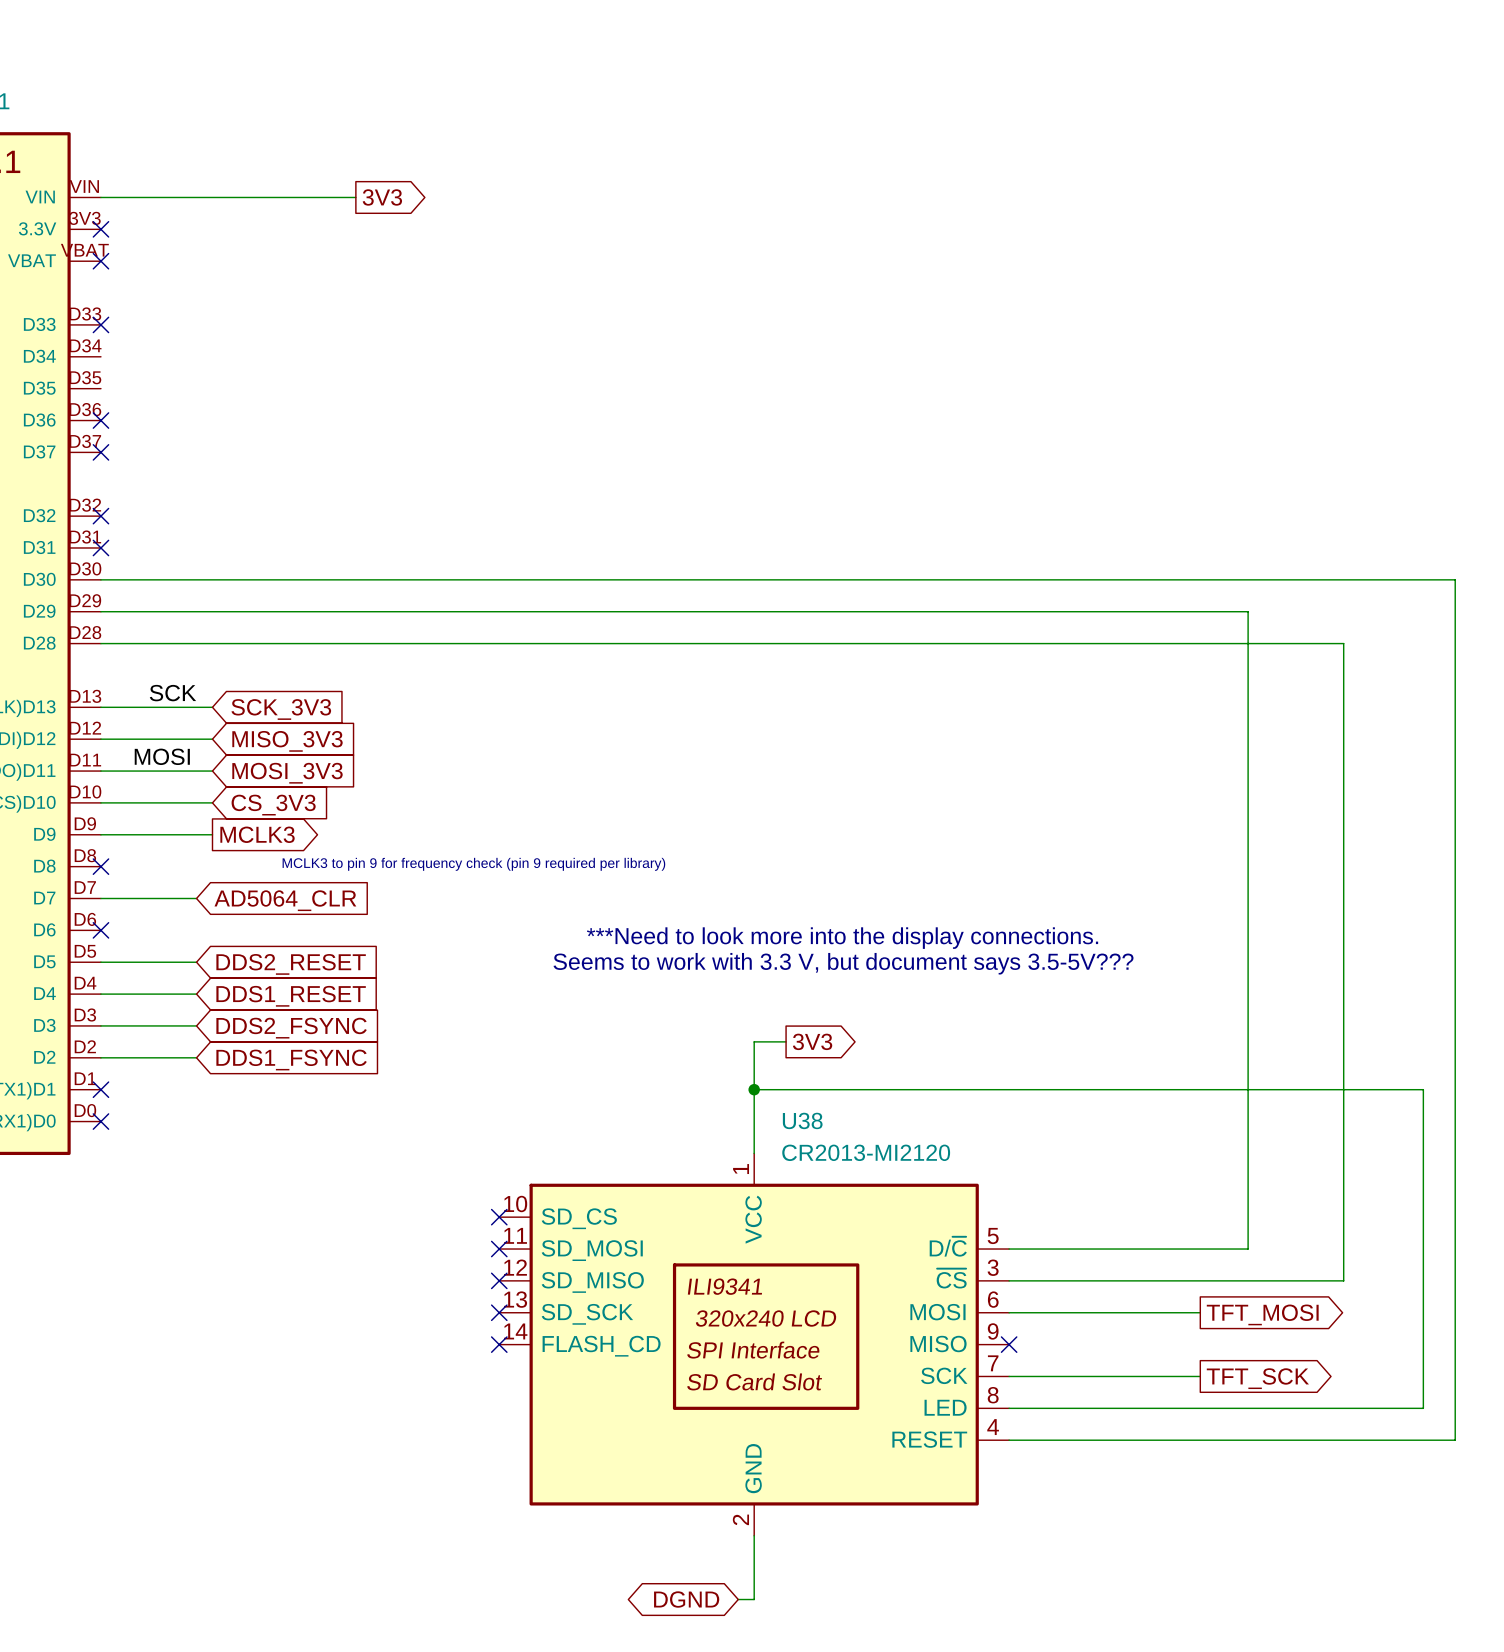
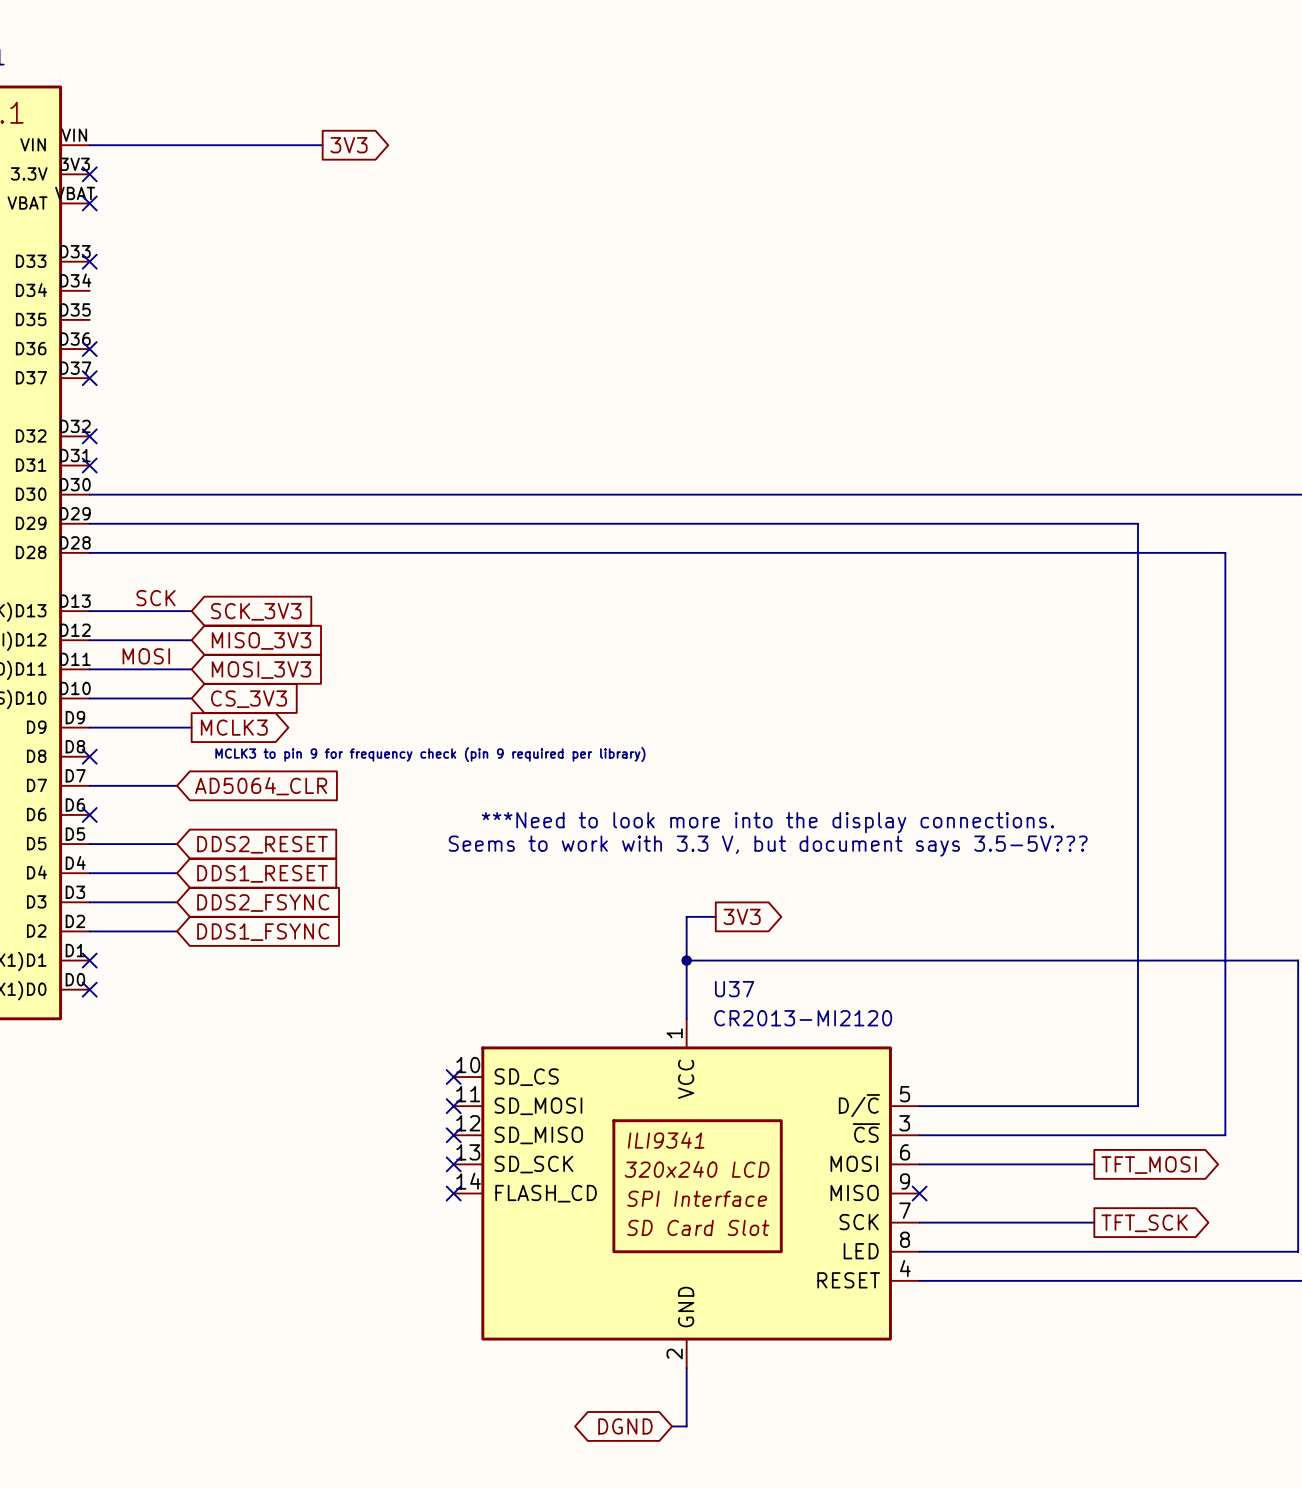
U38 name: U38 (802, 1120) -> U37 (734, 989)

